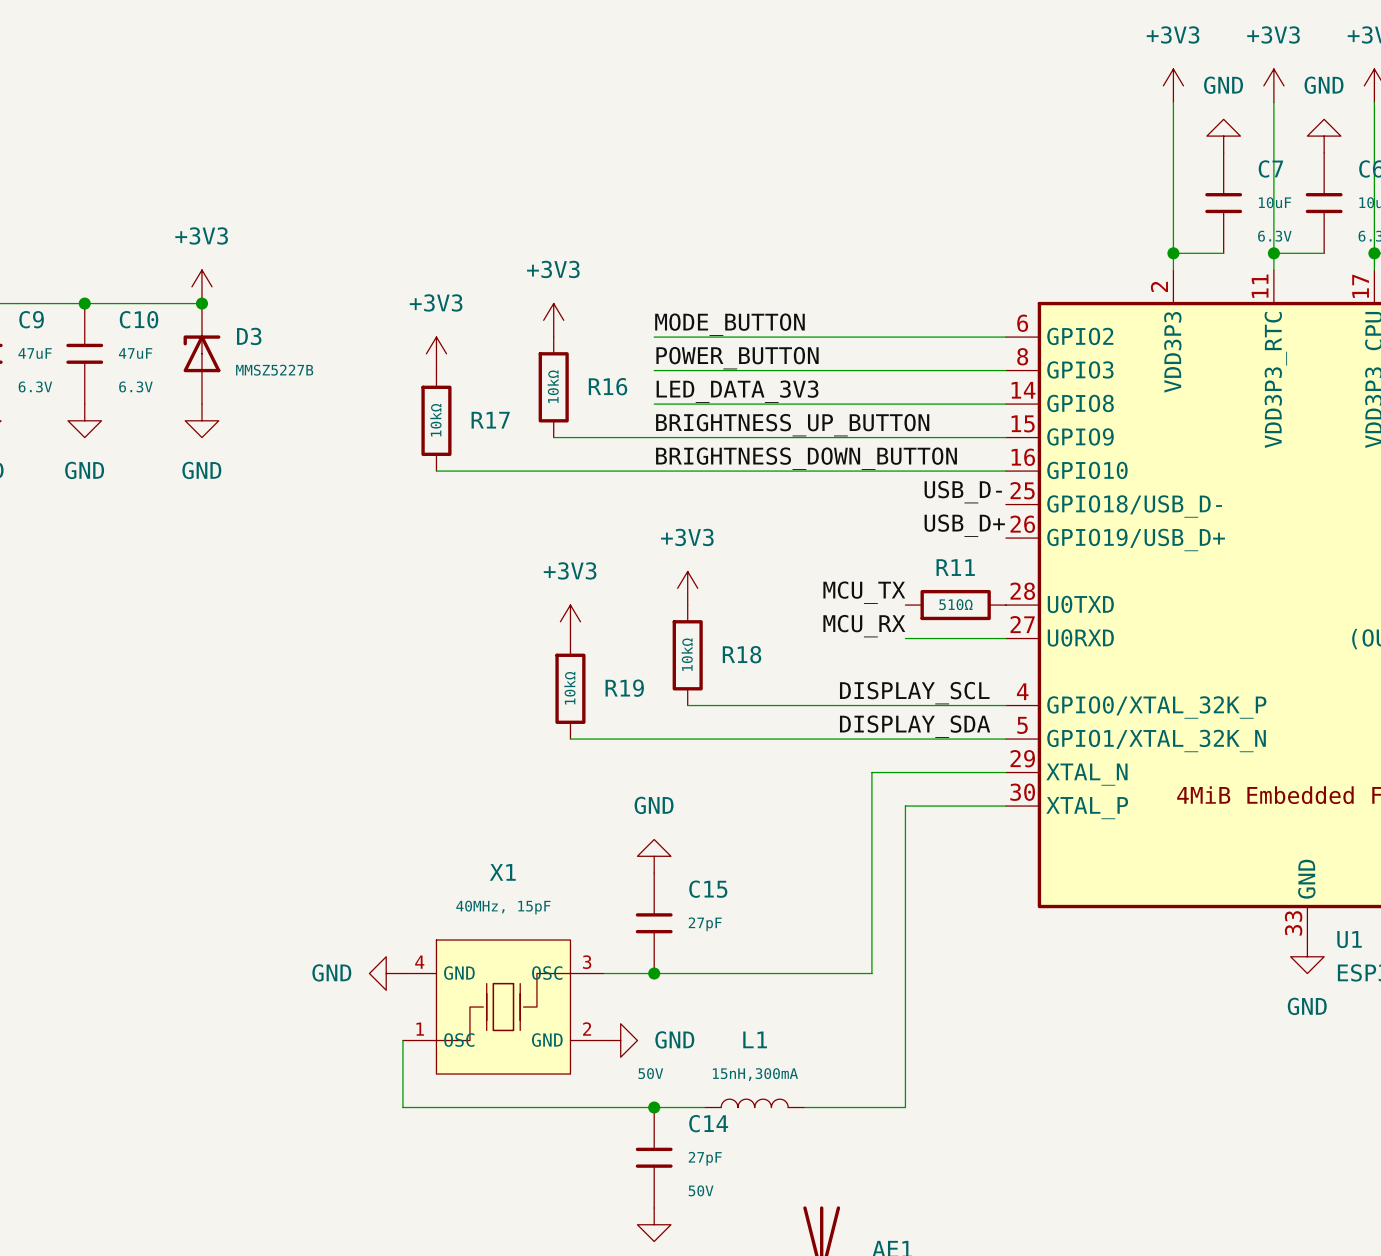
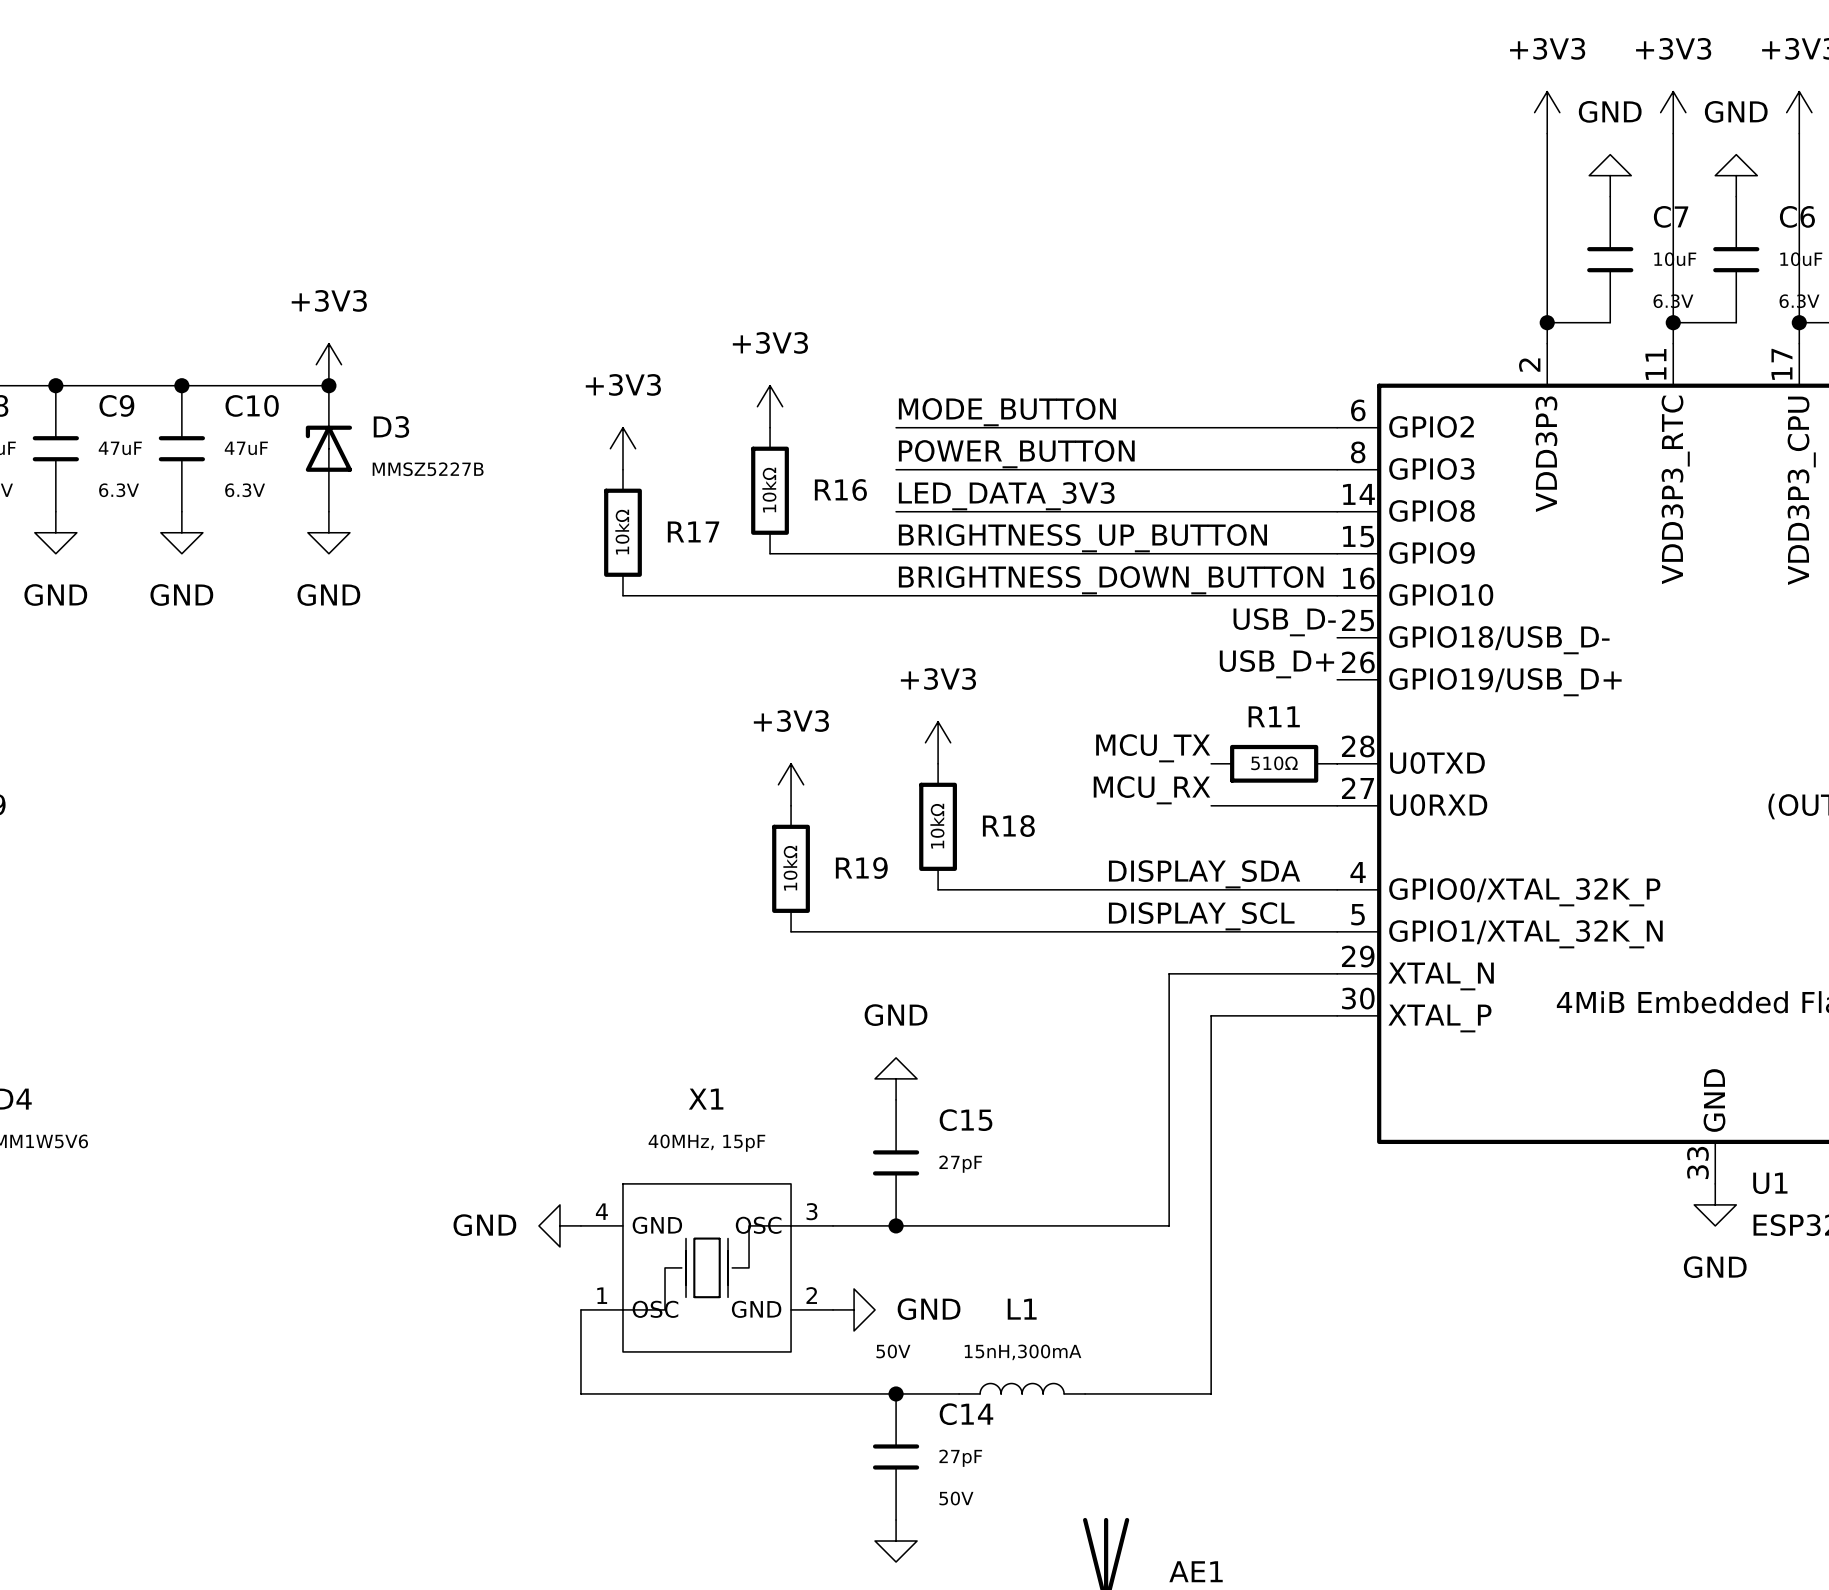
label position: DISPLAY_SCL (914, 693) -> DISPLAY_SCL (1201, 916)
label position: DISPLAY_SDA (915, 726) -> DISPLAY_SDA (1204, 874)

